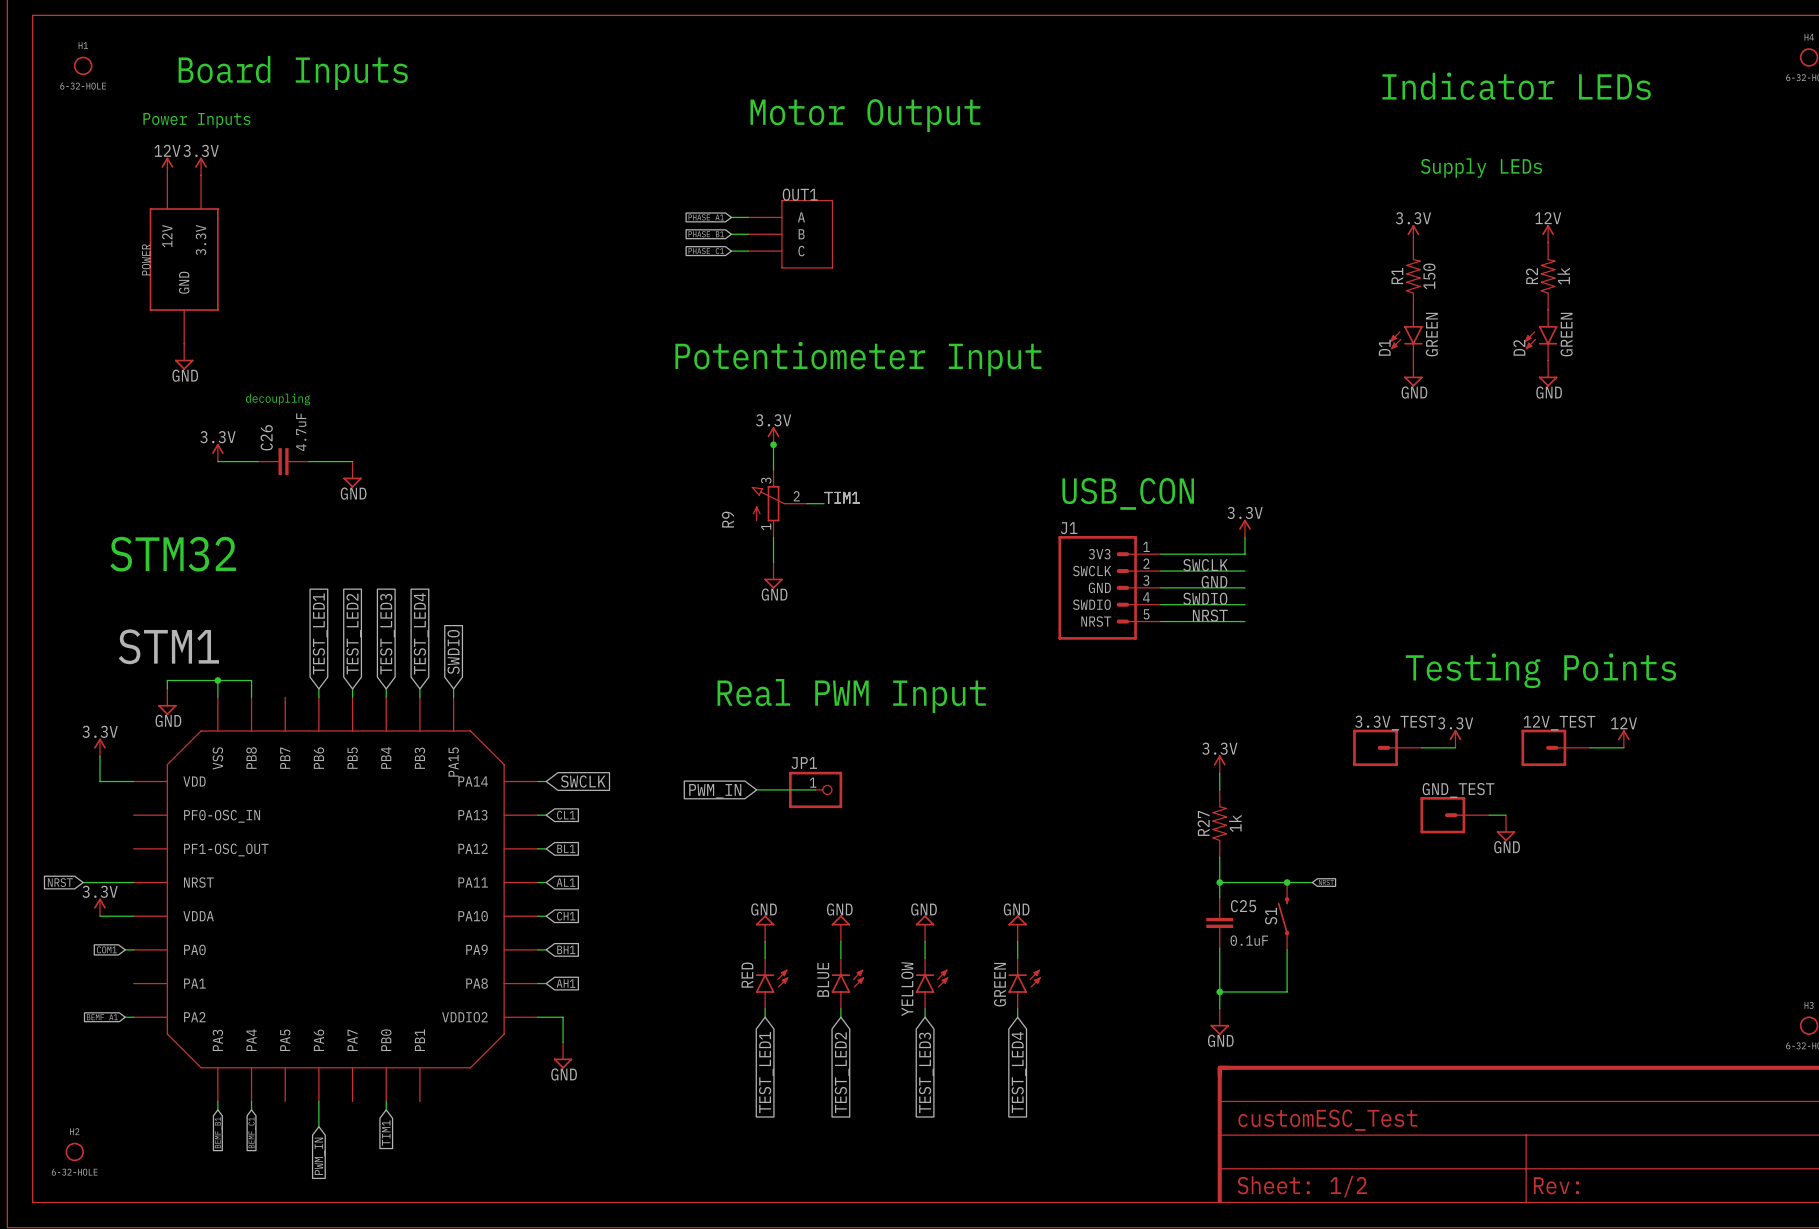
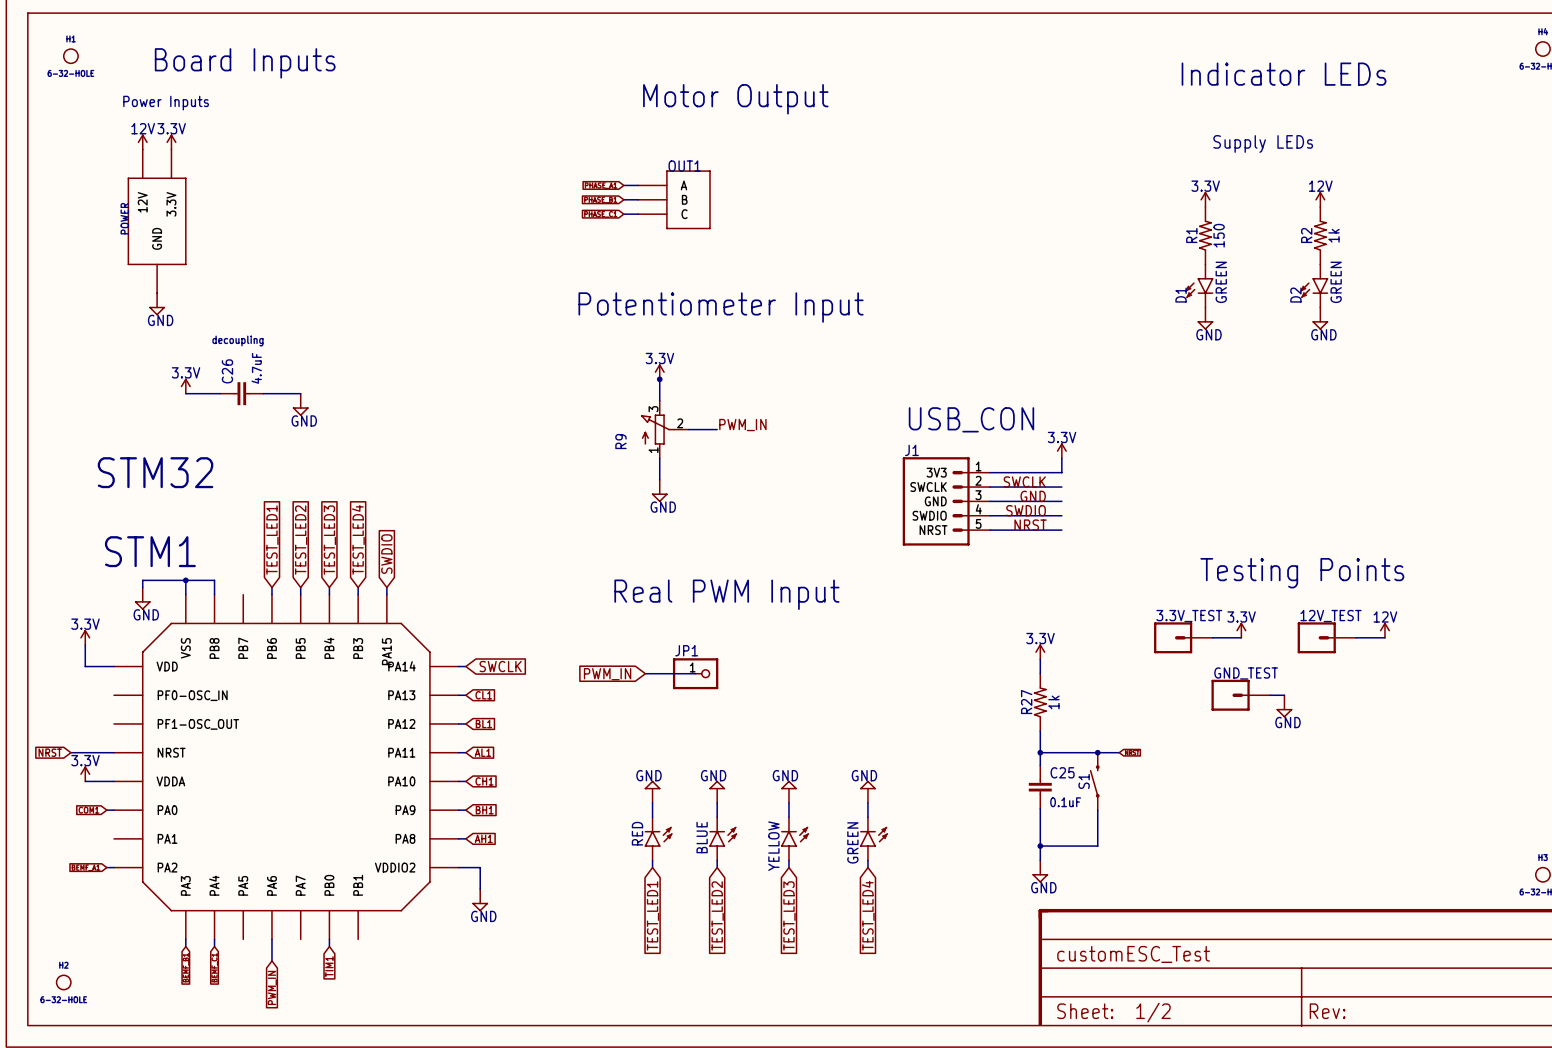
label: TIM1 (842, 497) -> none
label: none -> PWM_IN (742, 425)
wire: none -> (702, 429) (717, 429)

